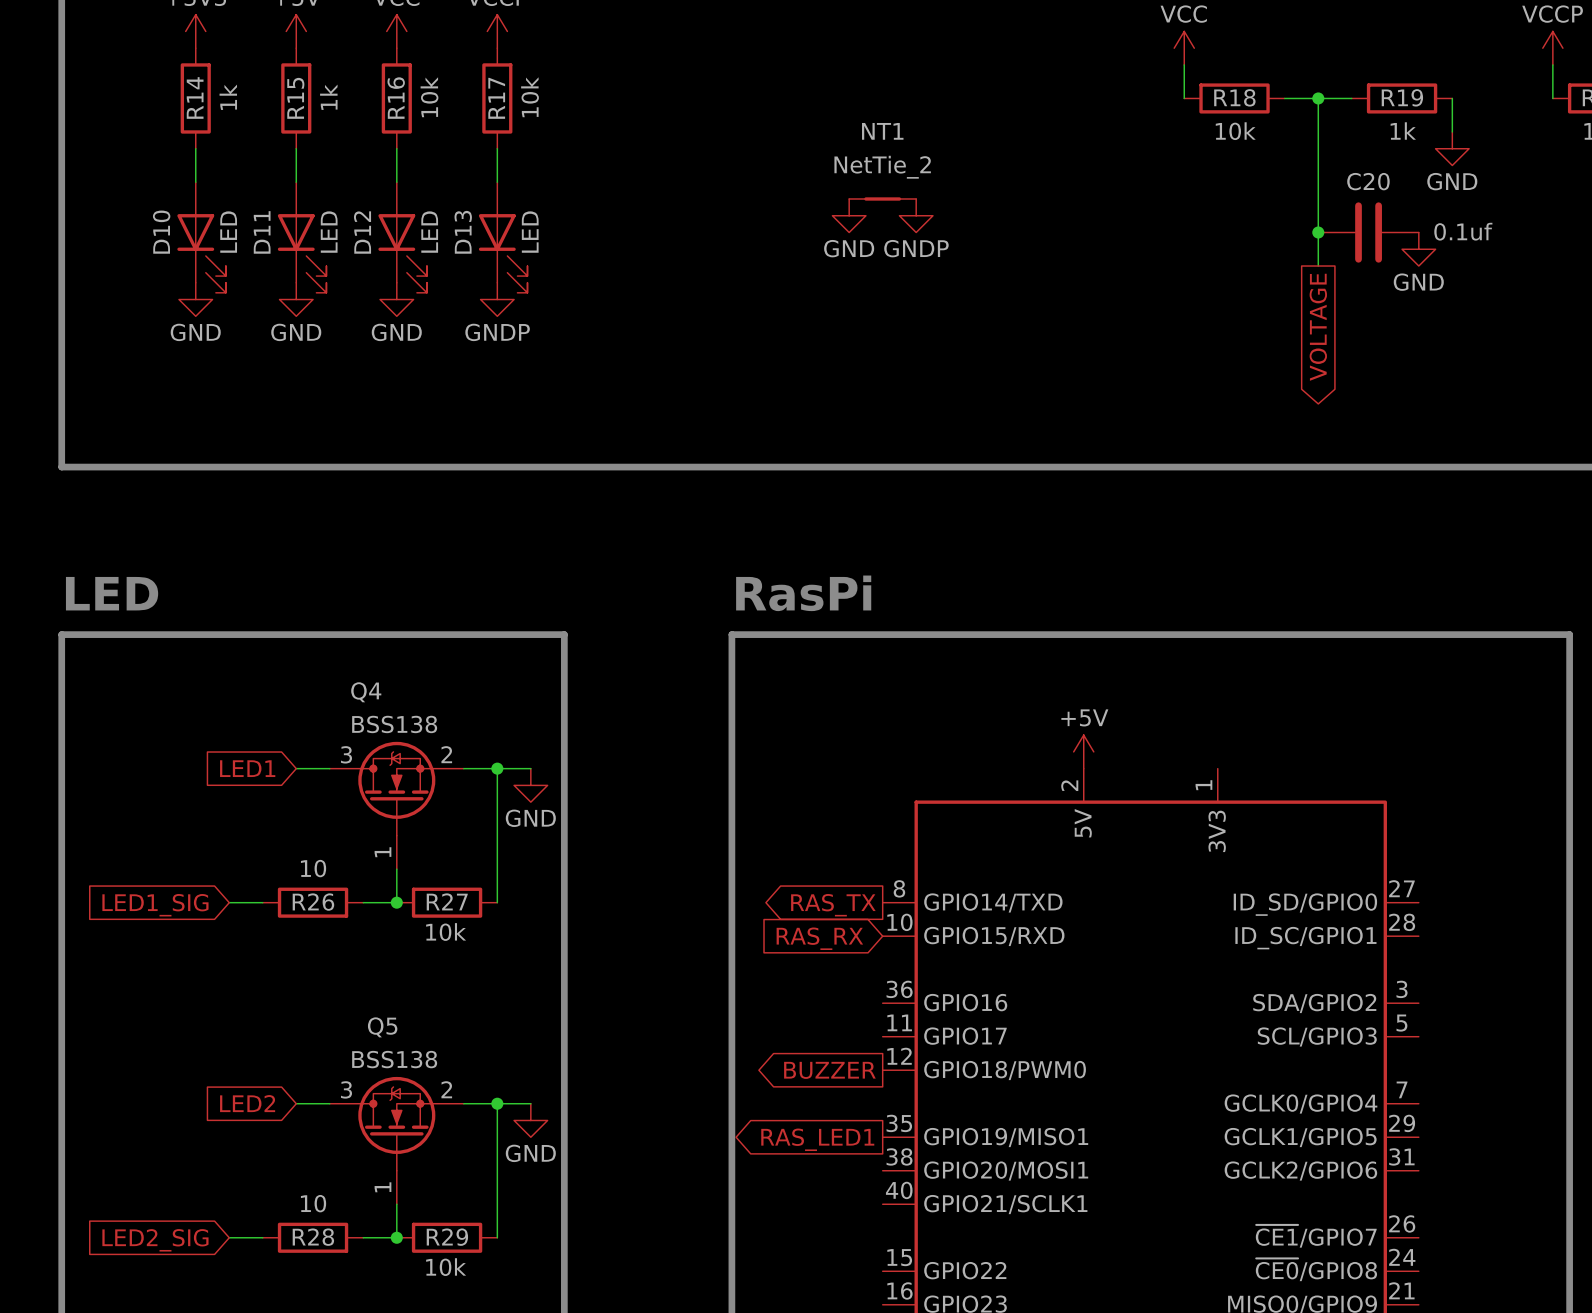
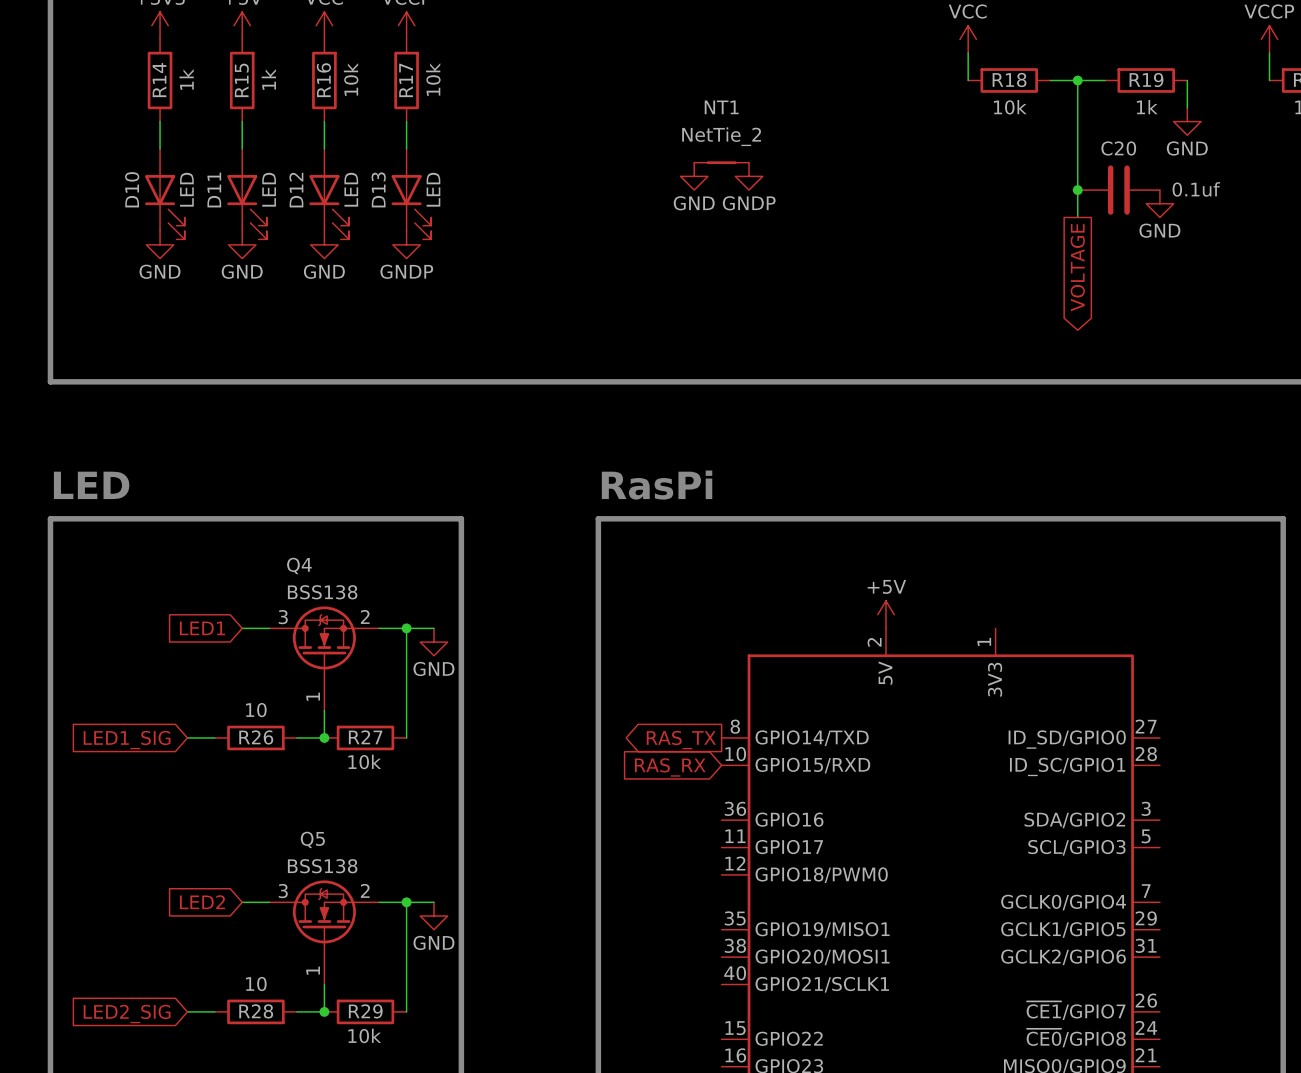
global label: BUZZER (829, 1070) -> none
global label: RAS_LED1 (817, 1139) -> none

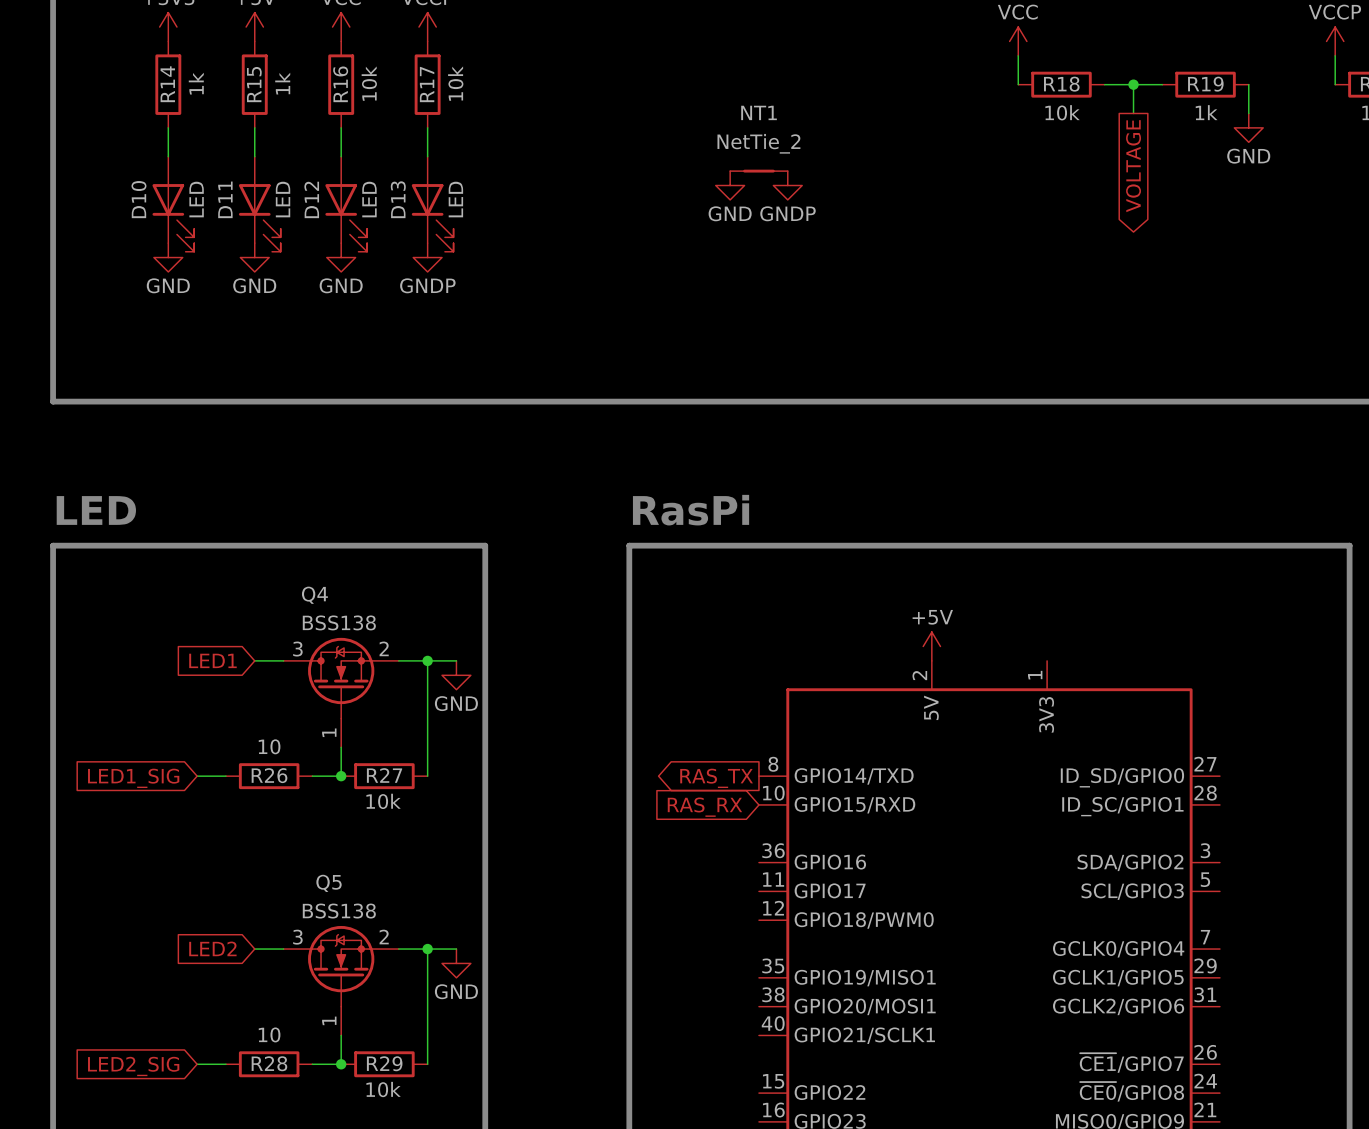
wire: (1077, 107) (1077, 217) -> none
junction: (1077, 190) -> none
C20: 0.1uf (1118, 190) -> none
power symbol: GND (1159, 203) -> none
global label position: VOLTAGE (1077, 267) -> VOLTAGE (1133, 166)

